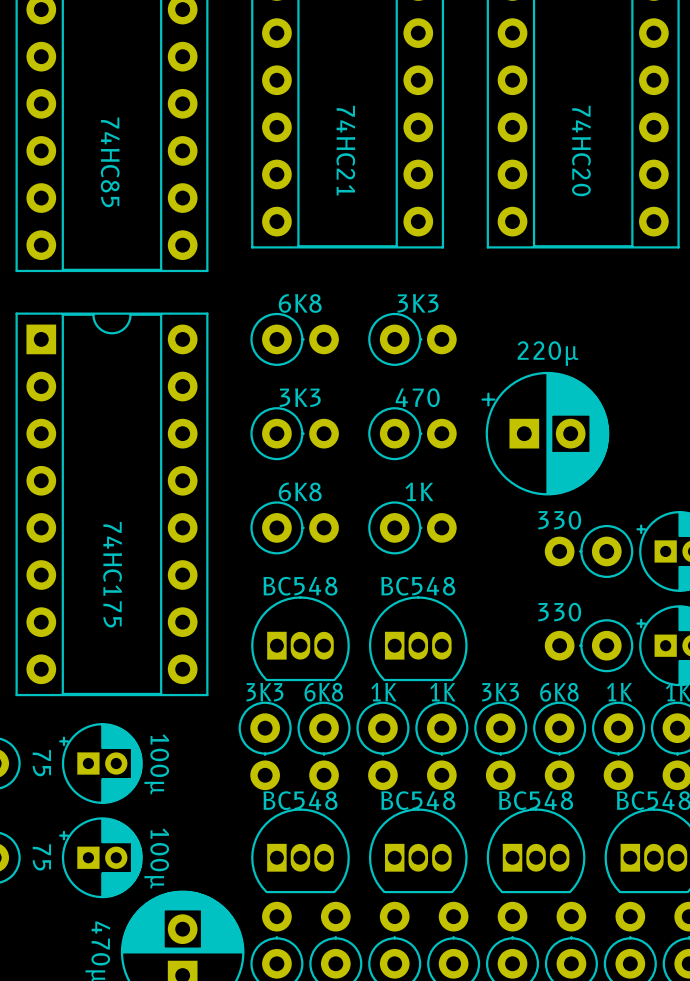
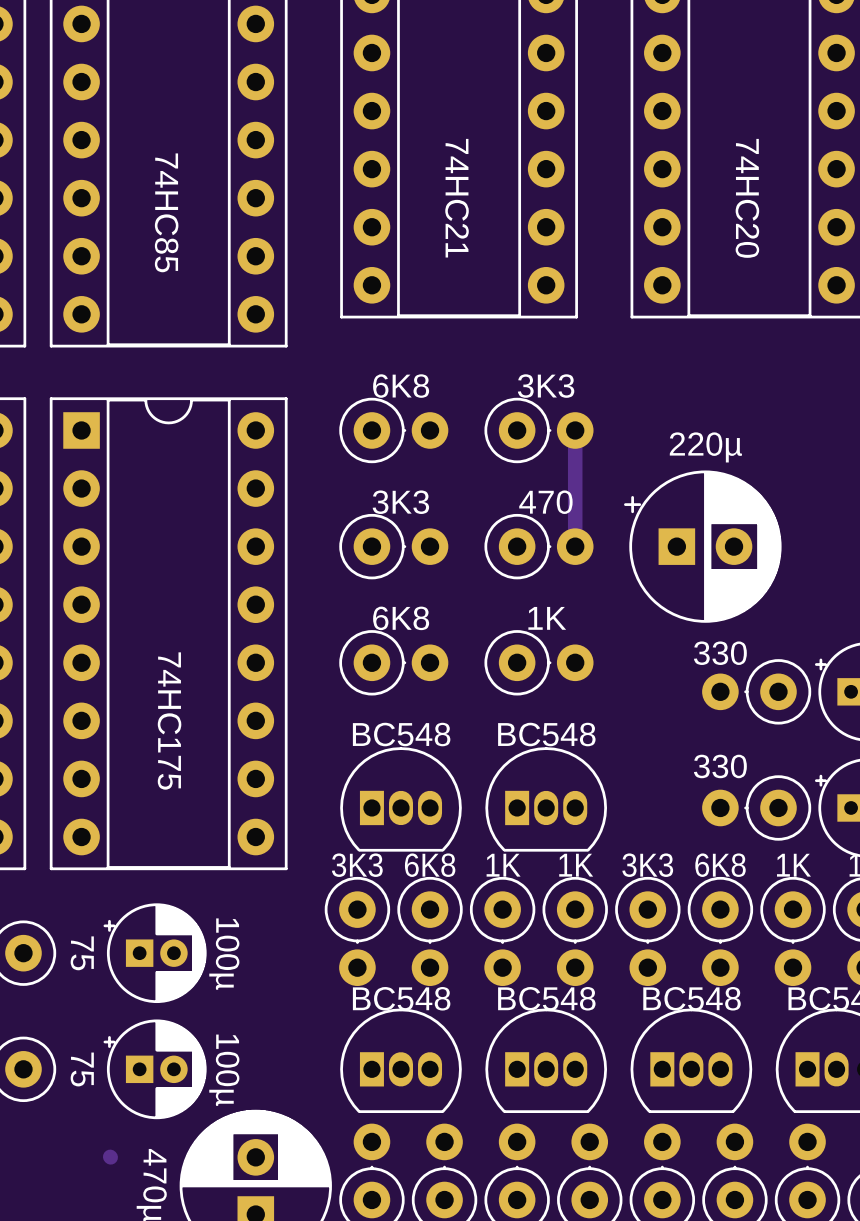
track: none -> (575, 430) (575, 546)
track: none -> (110, 1156) (110, 1157)

